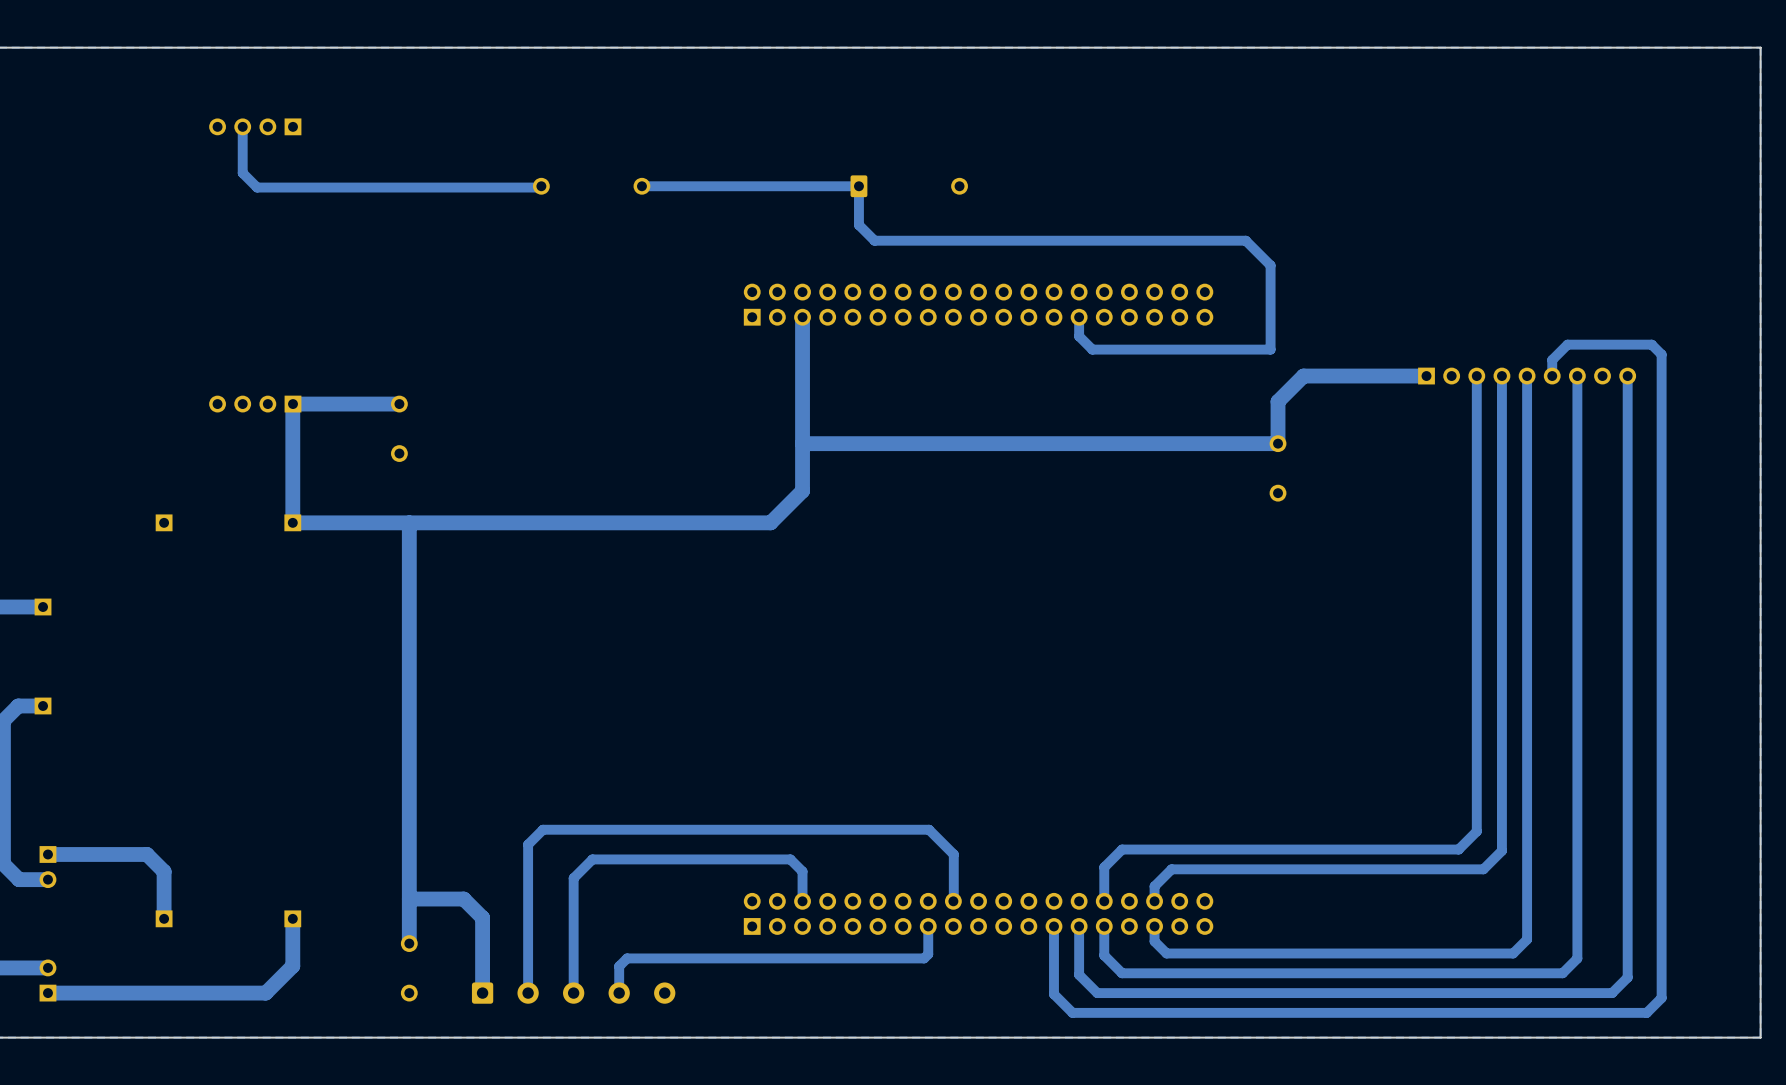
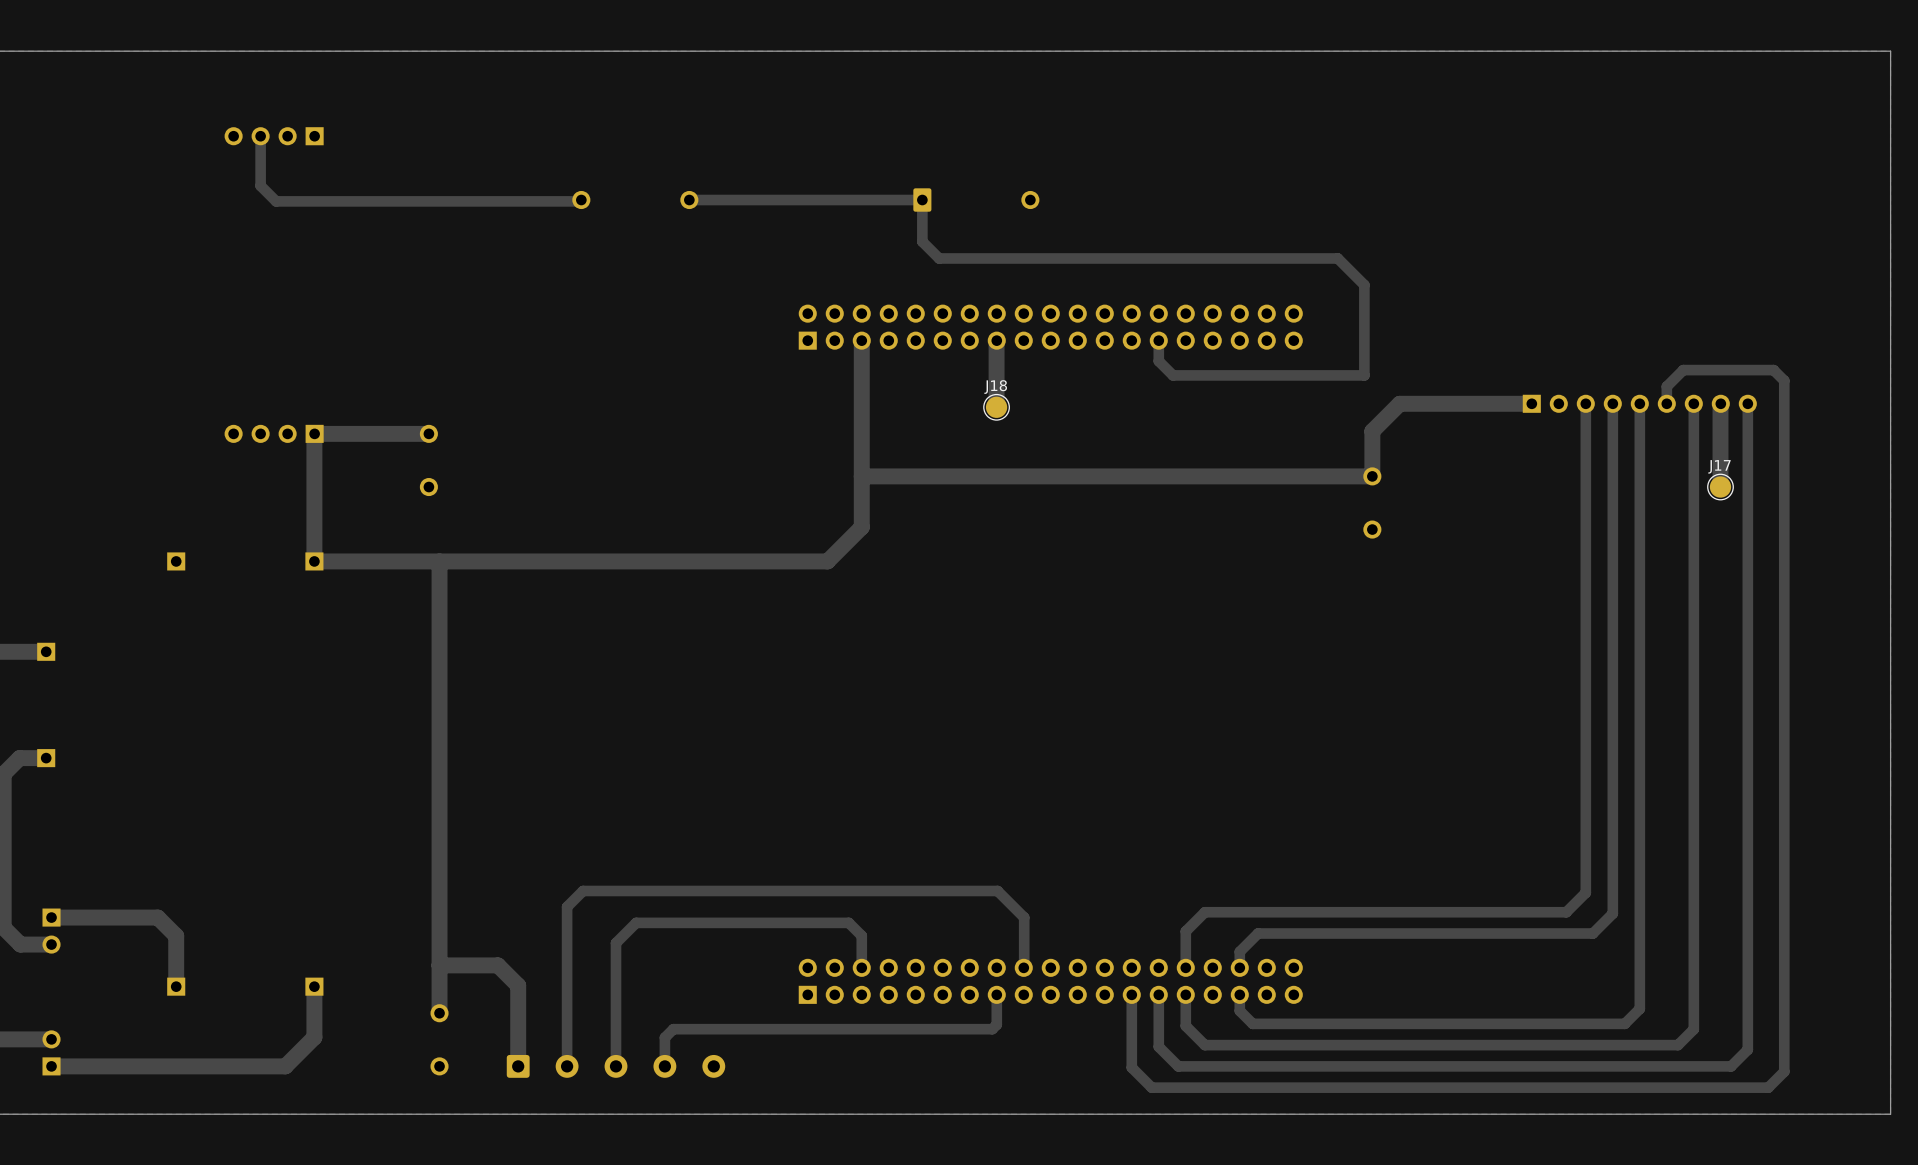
track: none -> (996, 340) (996, 407)
track: none -> (1720, 403) (1720, 487)
J18: none -> (996, 407)
J17: none -> (1720, 487)

